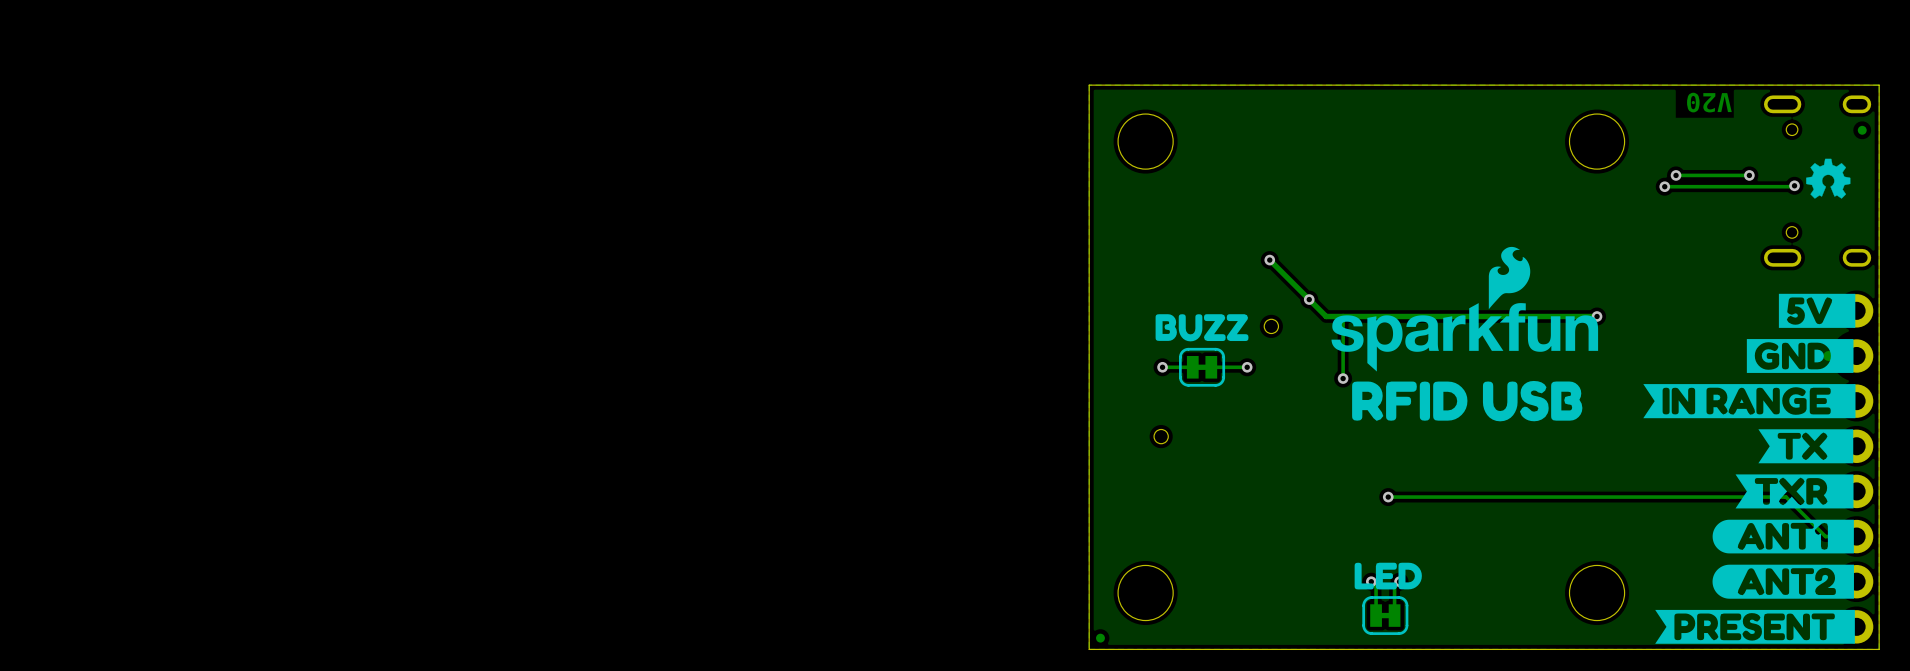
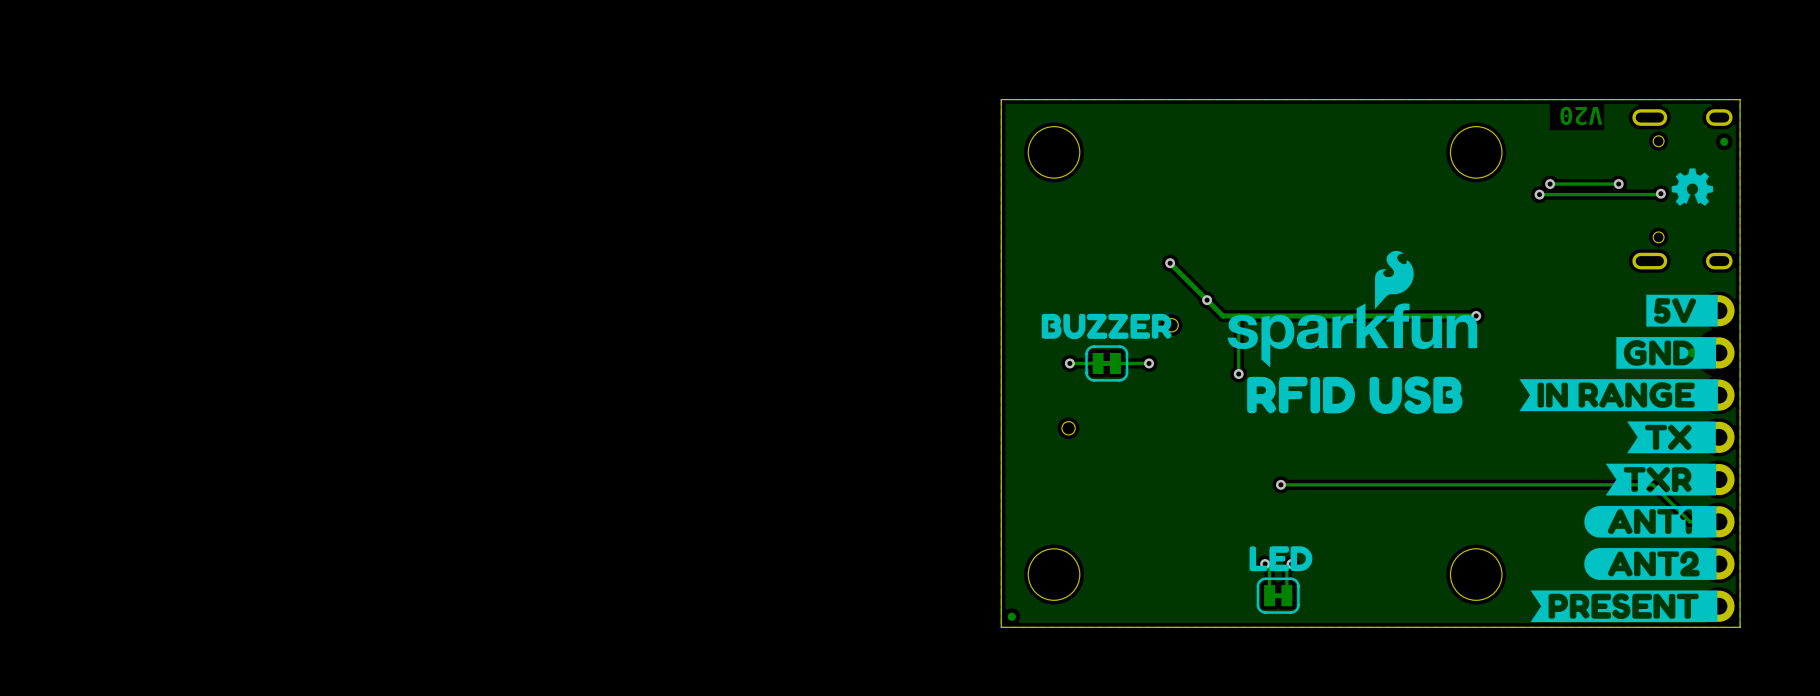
drawing shape: [1155, 314, 1249, 342] -> [1041, 313, 1172, 340]

